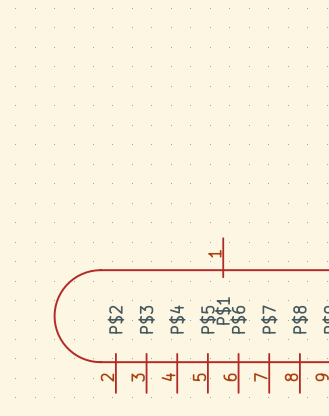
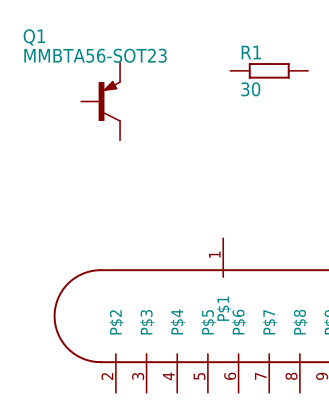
R1: none -> 30 (269, 70)
Q1: none -> MMBTA56-SOT23 (100, 101)

